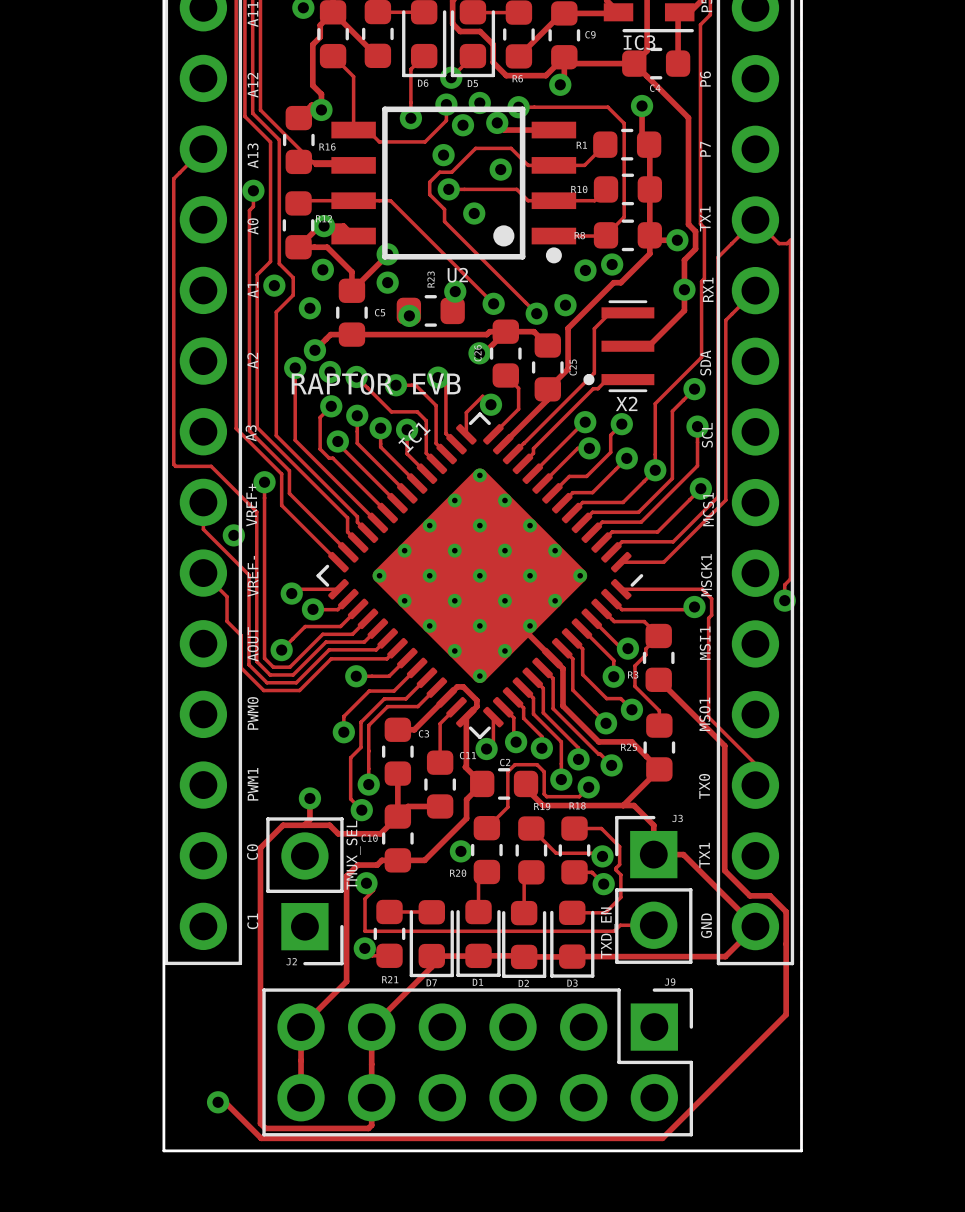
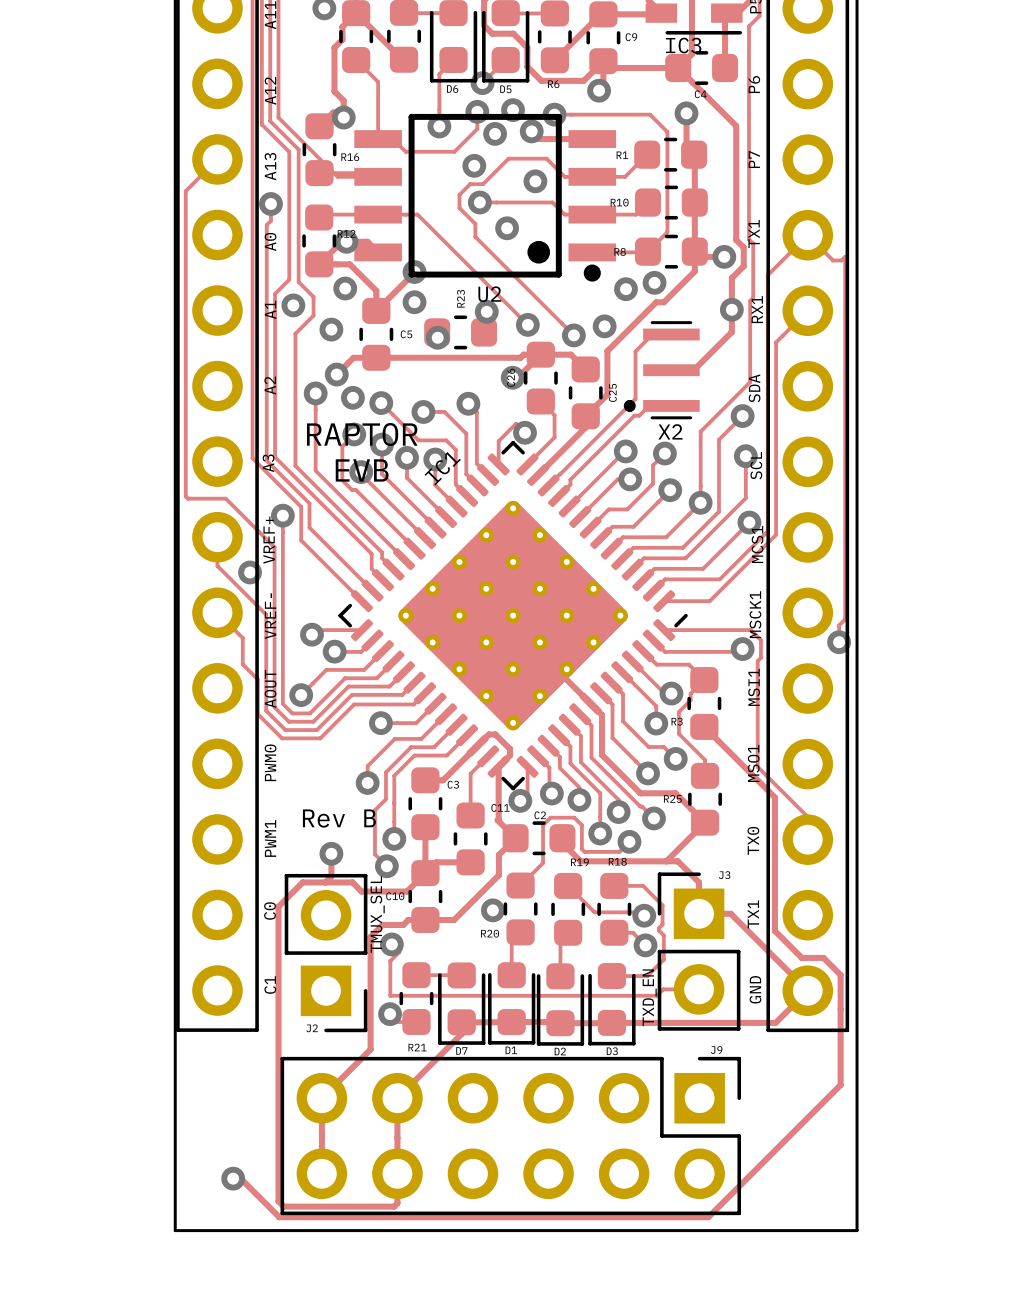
text: RAPTOR EVB (376, 383) -> RAPTOR (362, 434)
text: none -> EVB (362, 470)
text: none -> Rev B (339, 818)

